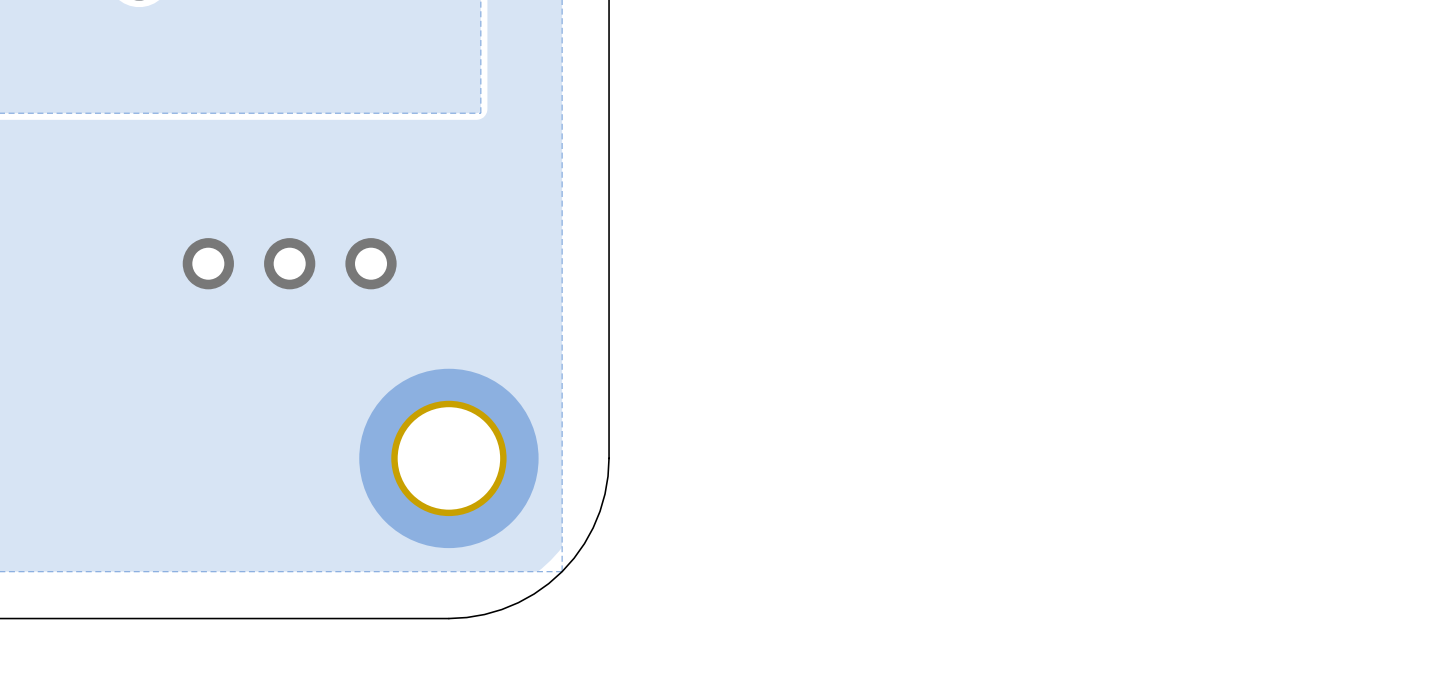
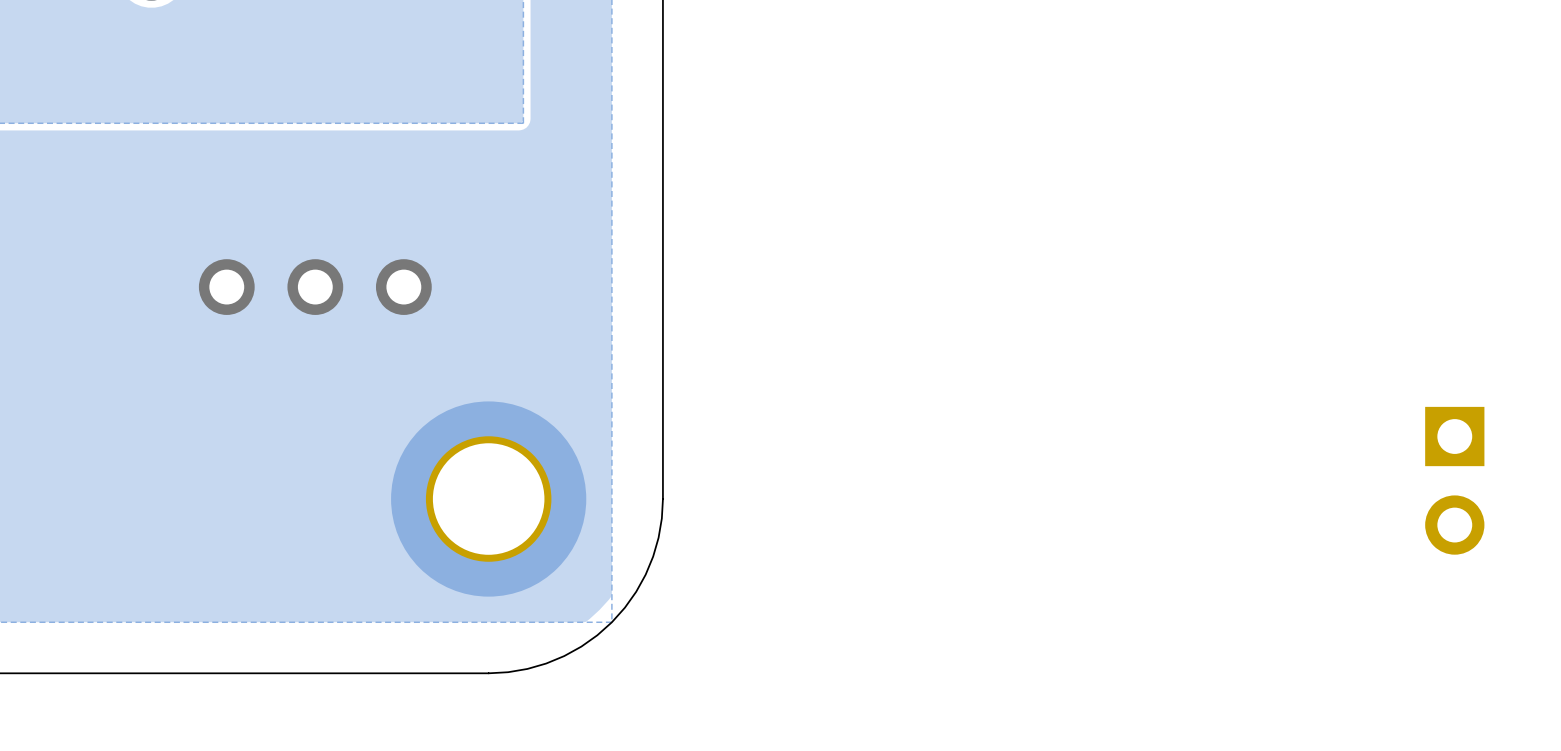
part: none -> (1454, 480)

